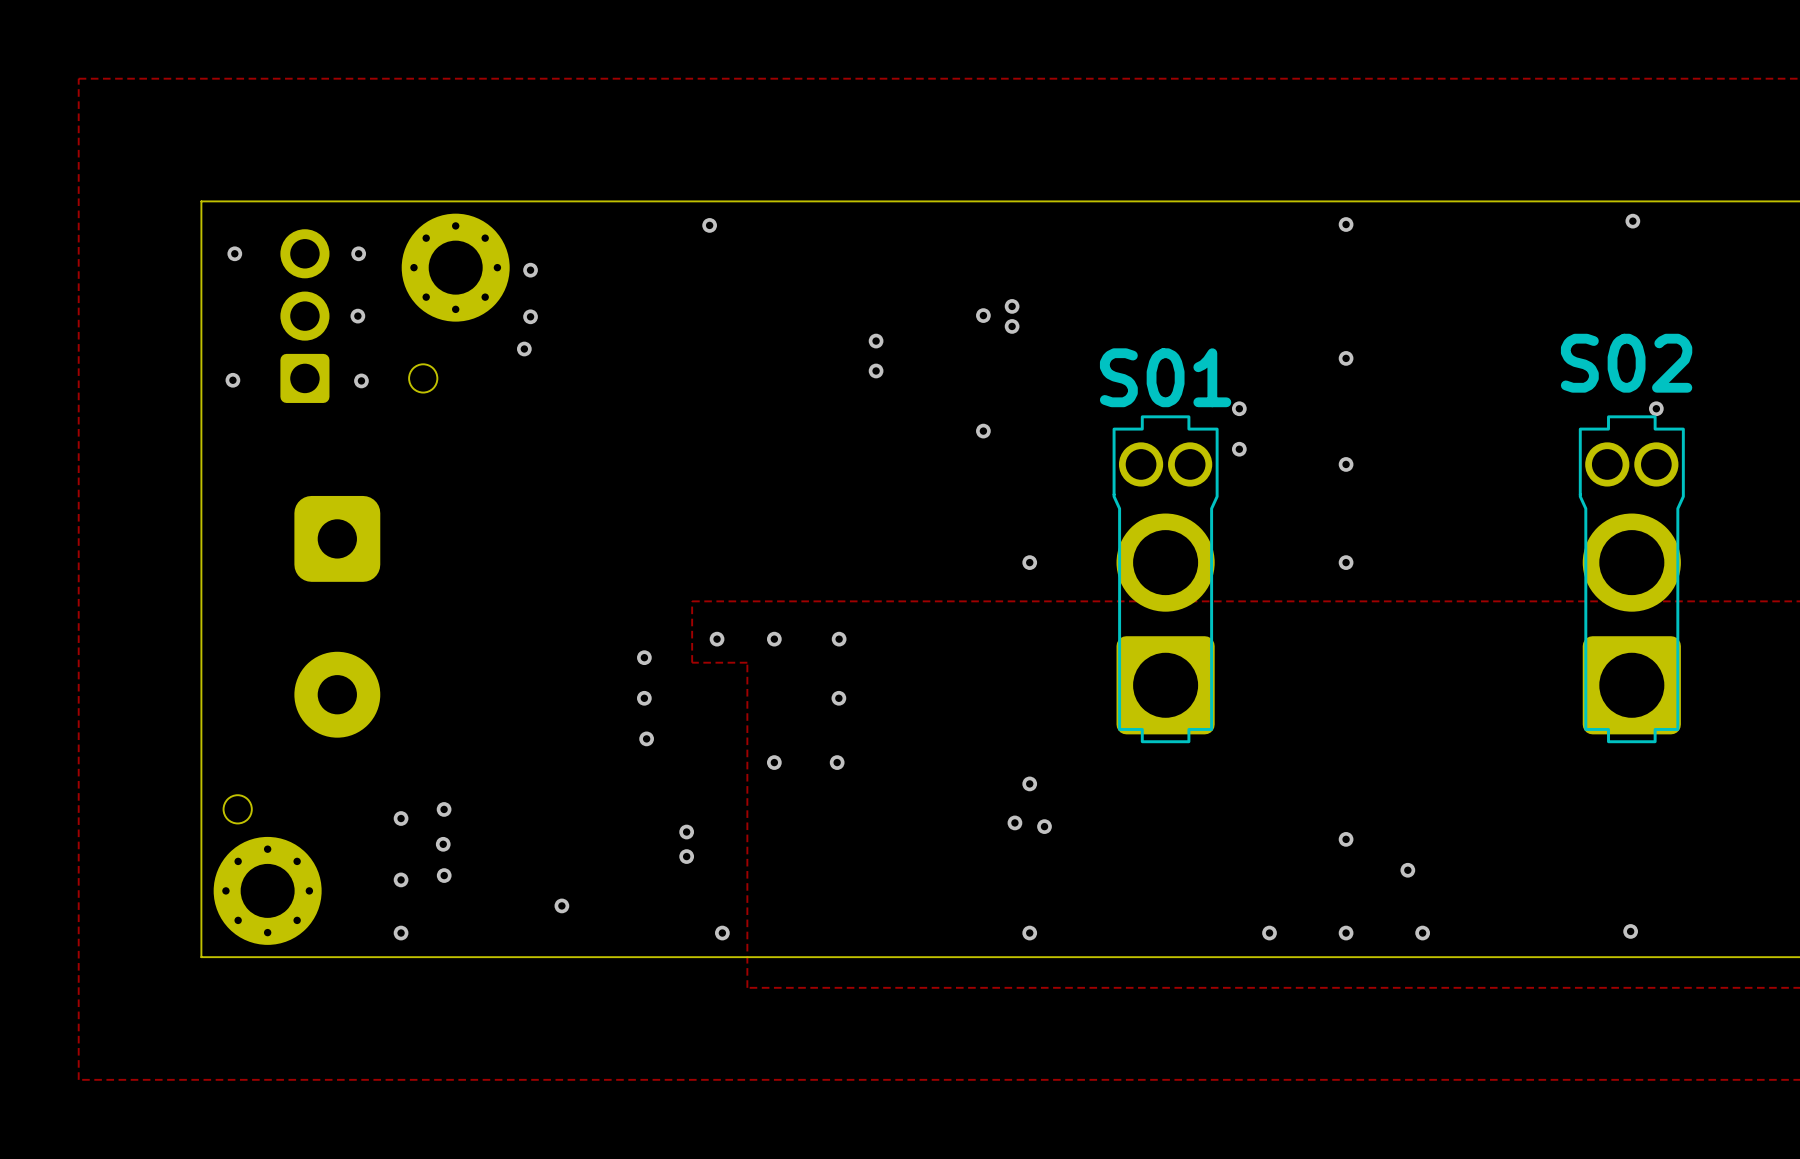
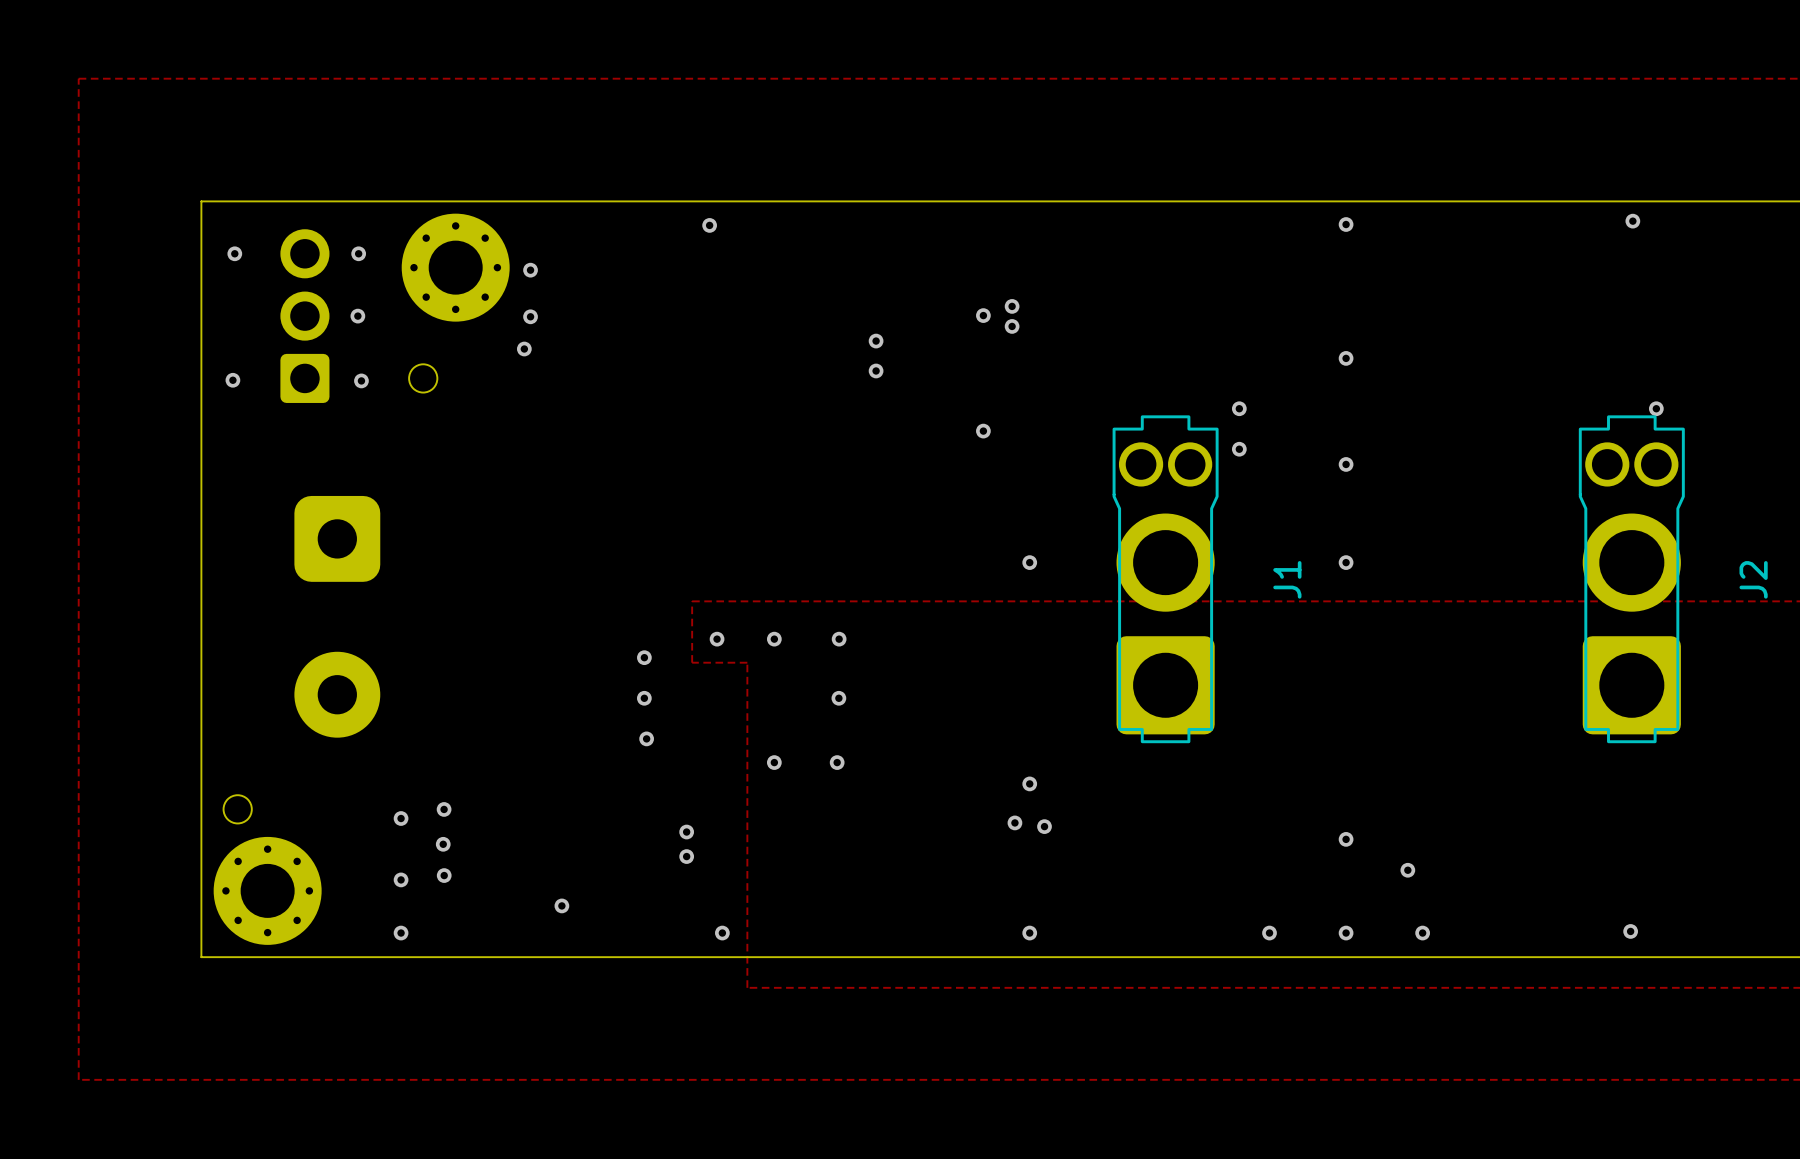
text: S02 (1626, 363) -> none
text: S01 (1165, 377) -> none
J1 name: none -> J1 (1287, 579)
J2 name: none -> J2 (1753, 579)

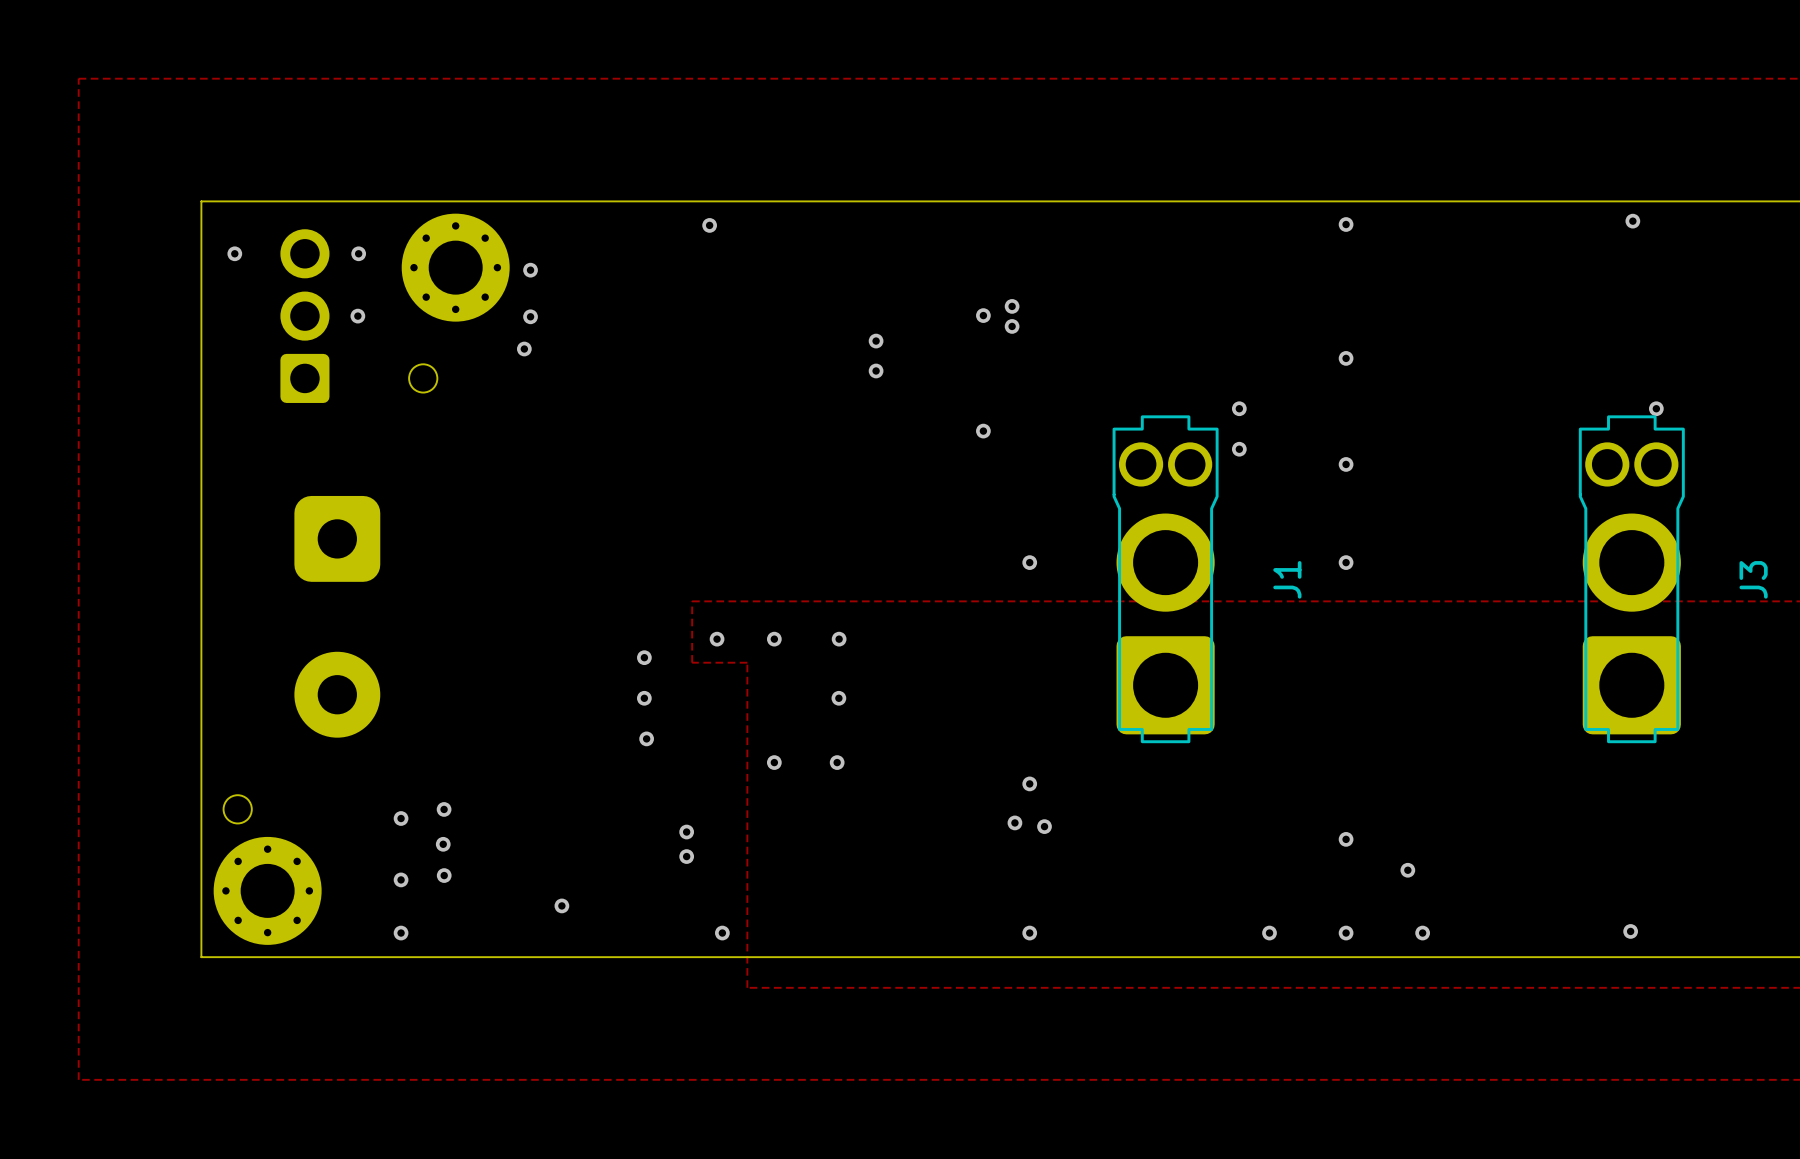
via: (232, 380) -> none
via: (361, 380) -> none
J2 name: J2 (1753, 579) -> J3 (1753, 579)

